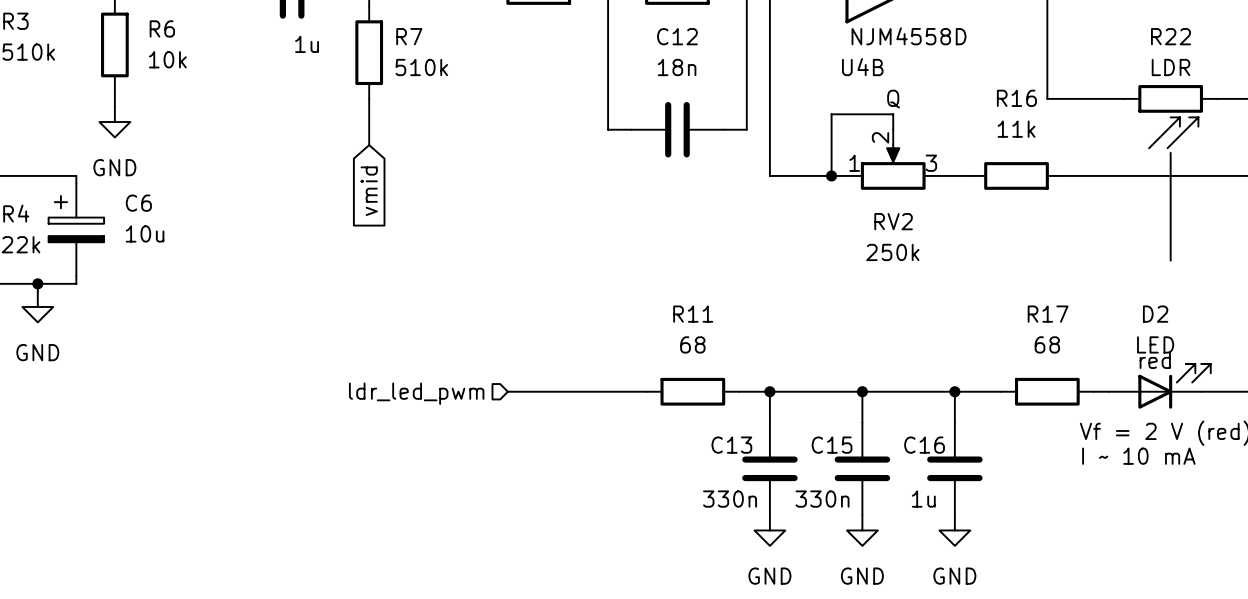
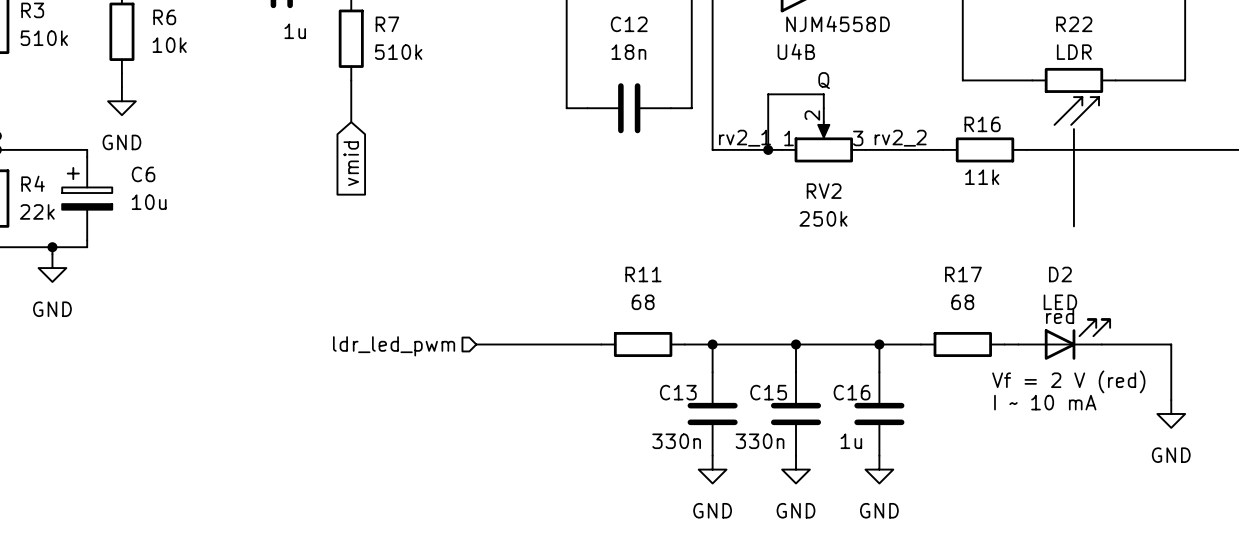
R16 name position: R16 (1016, 98) -> R16 (982, 124)
R16 value position: 11k (1016, 129) -> 11k (982, 177)
label: none -> rv2_1 (744, 138)
label: none -> rv2_2 (900, 138)
R16 position: (1016, 175) -> (985, 149)
wire: (1062, 175) (1118, 175) -> (893, 149) (943, 149)

